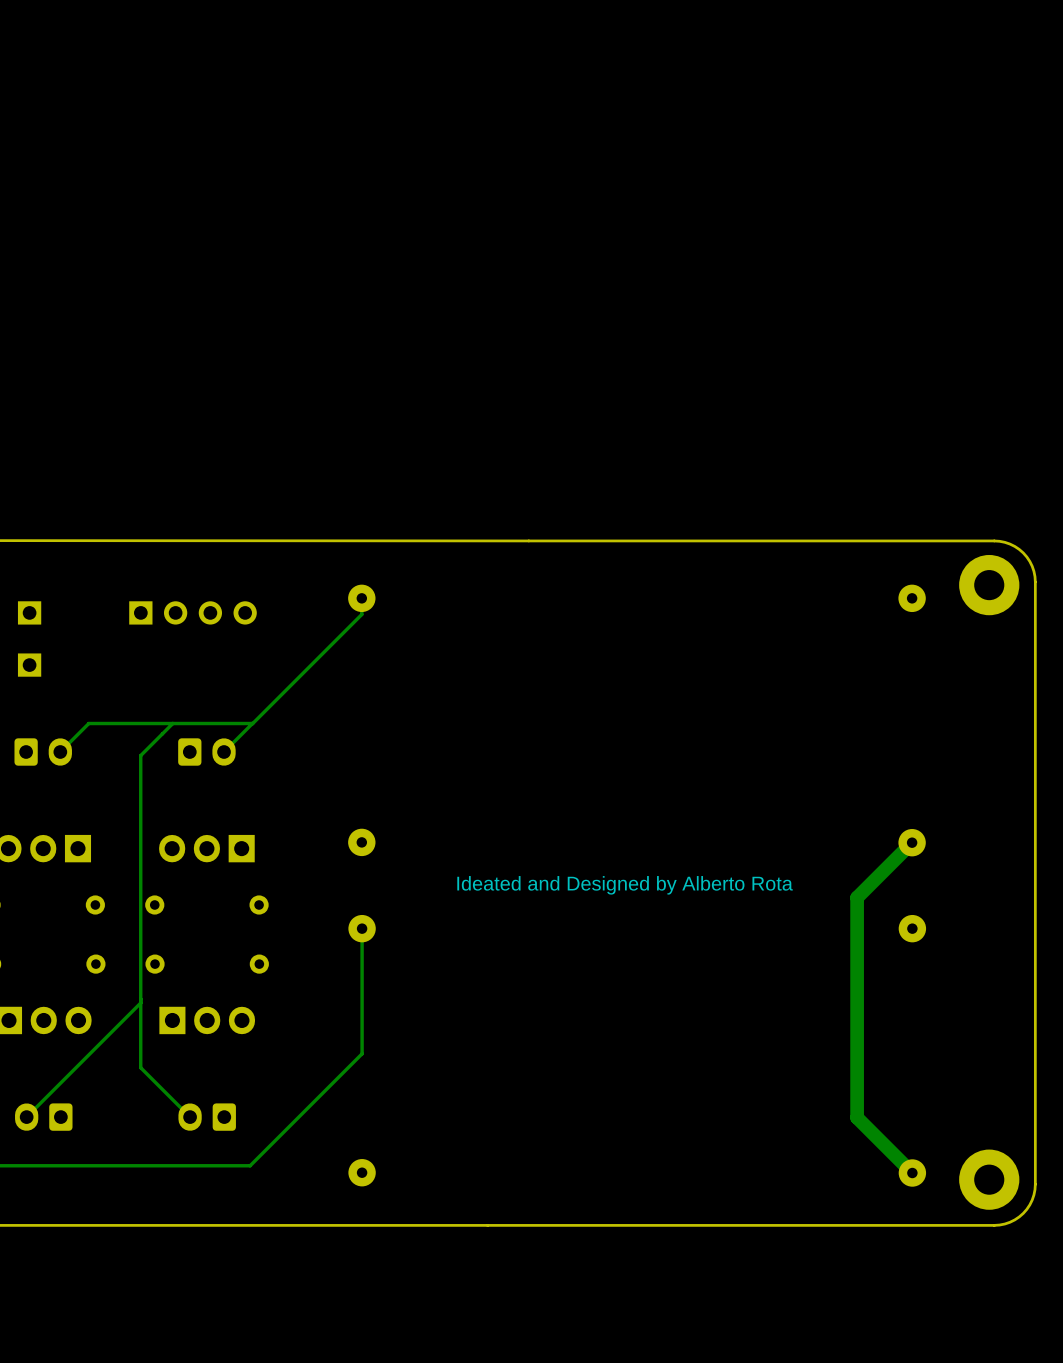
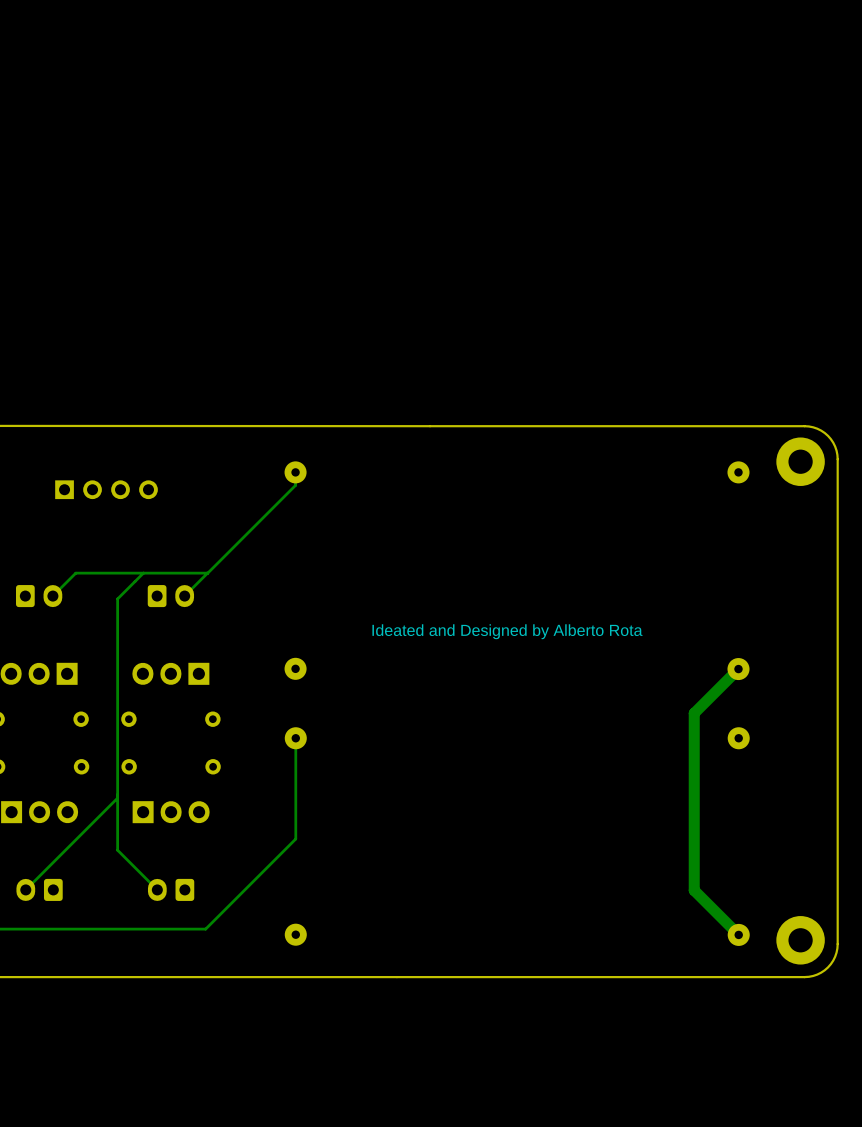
part: (29, 612) -> none
part position: (193, 612) -> (106, 489)
part: (29, 665) -> none
text position: Ideated and Designed by Alberto Rota (625, 885) -> Ideated and Designed by Alberto Rota (507, 631)

